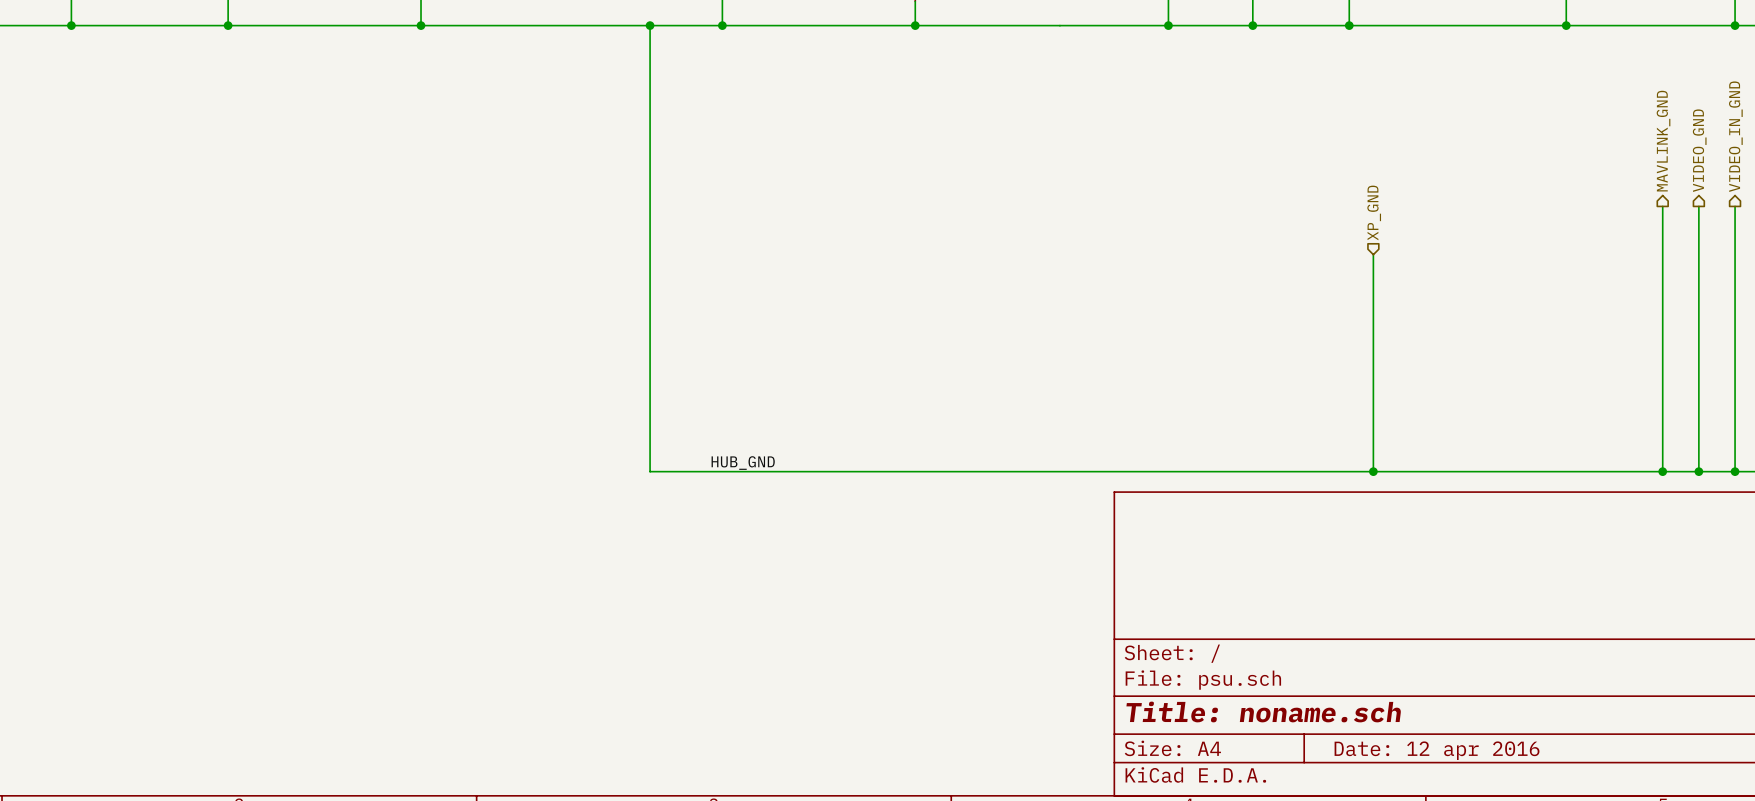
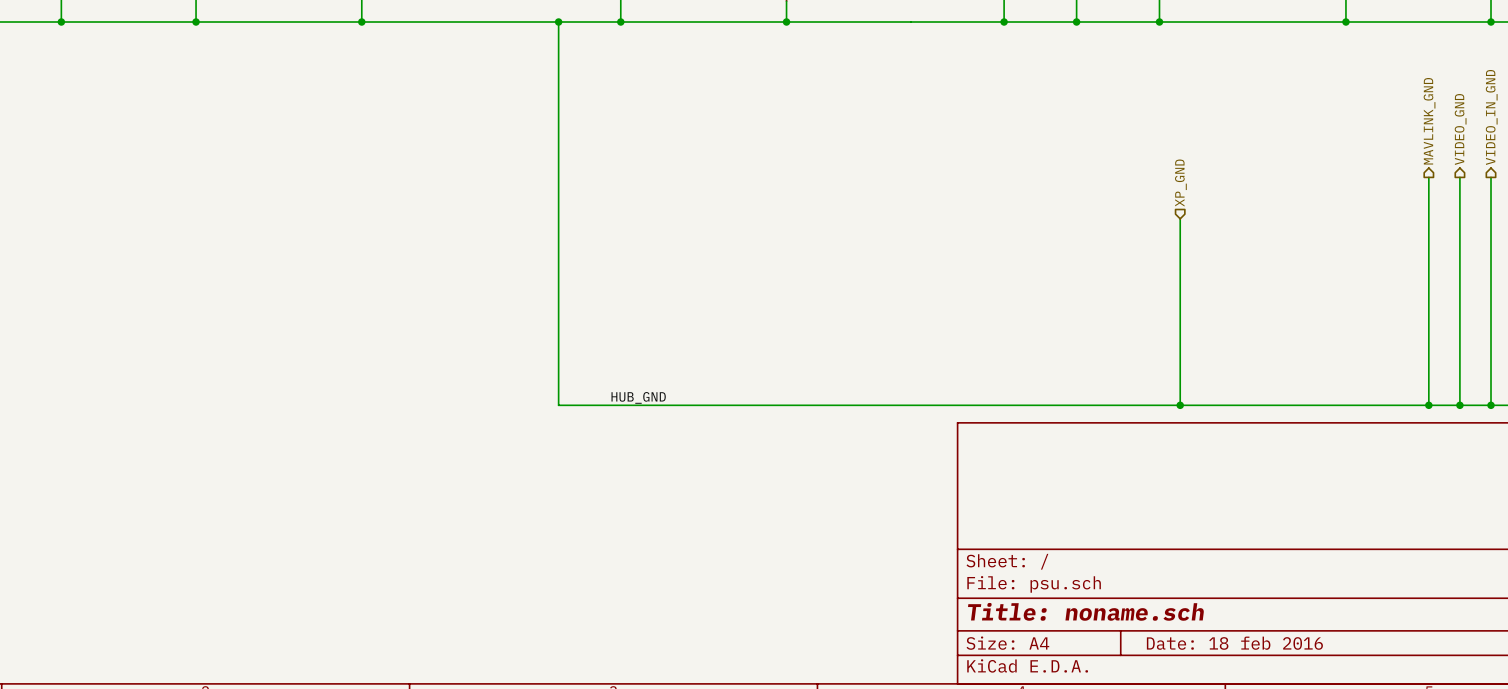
title block: Date: 12 apr 2016 (1437, 750) -> Date: 18 feb 2016 (1234, 643)

